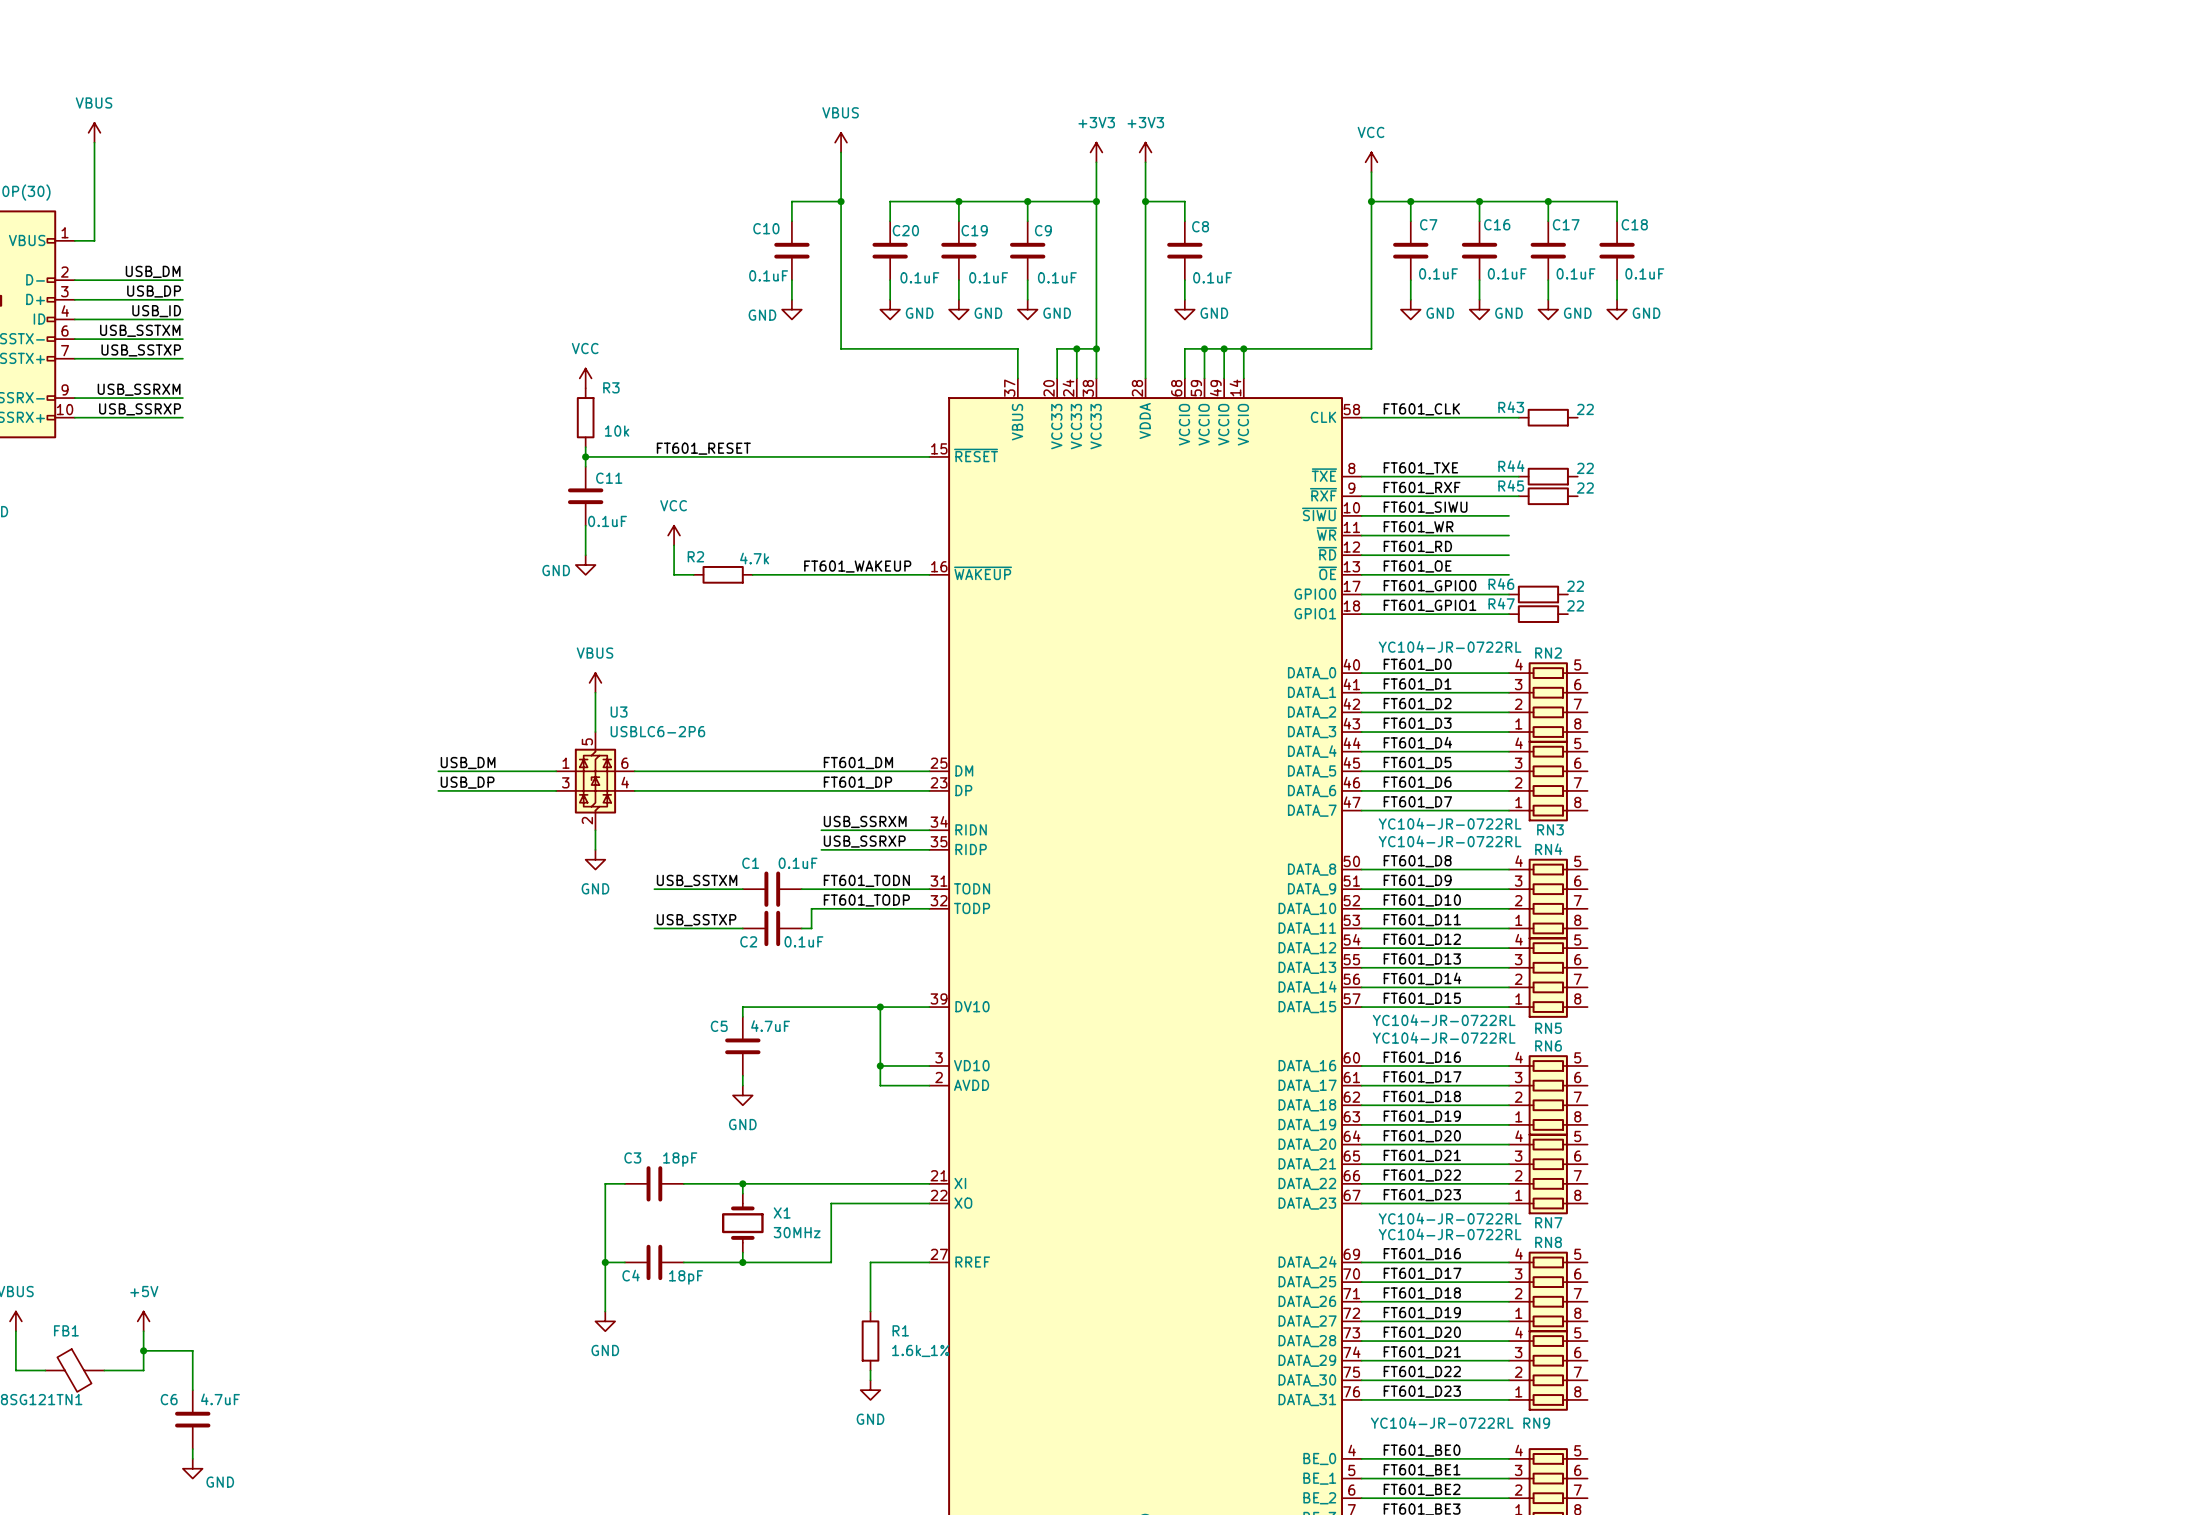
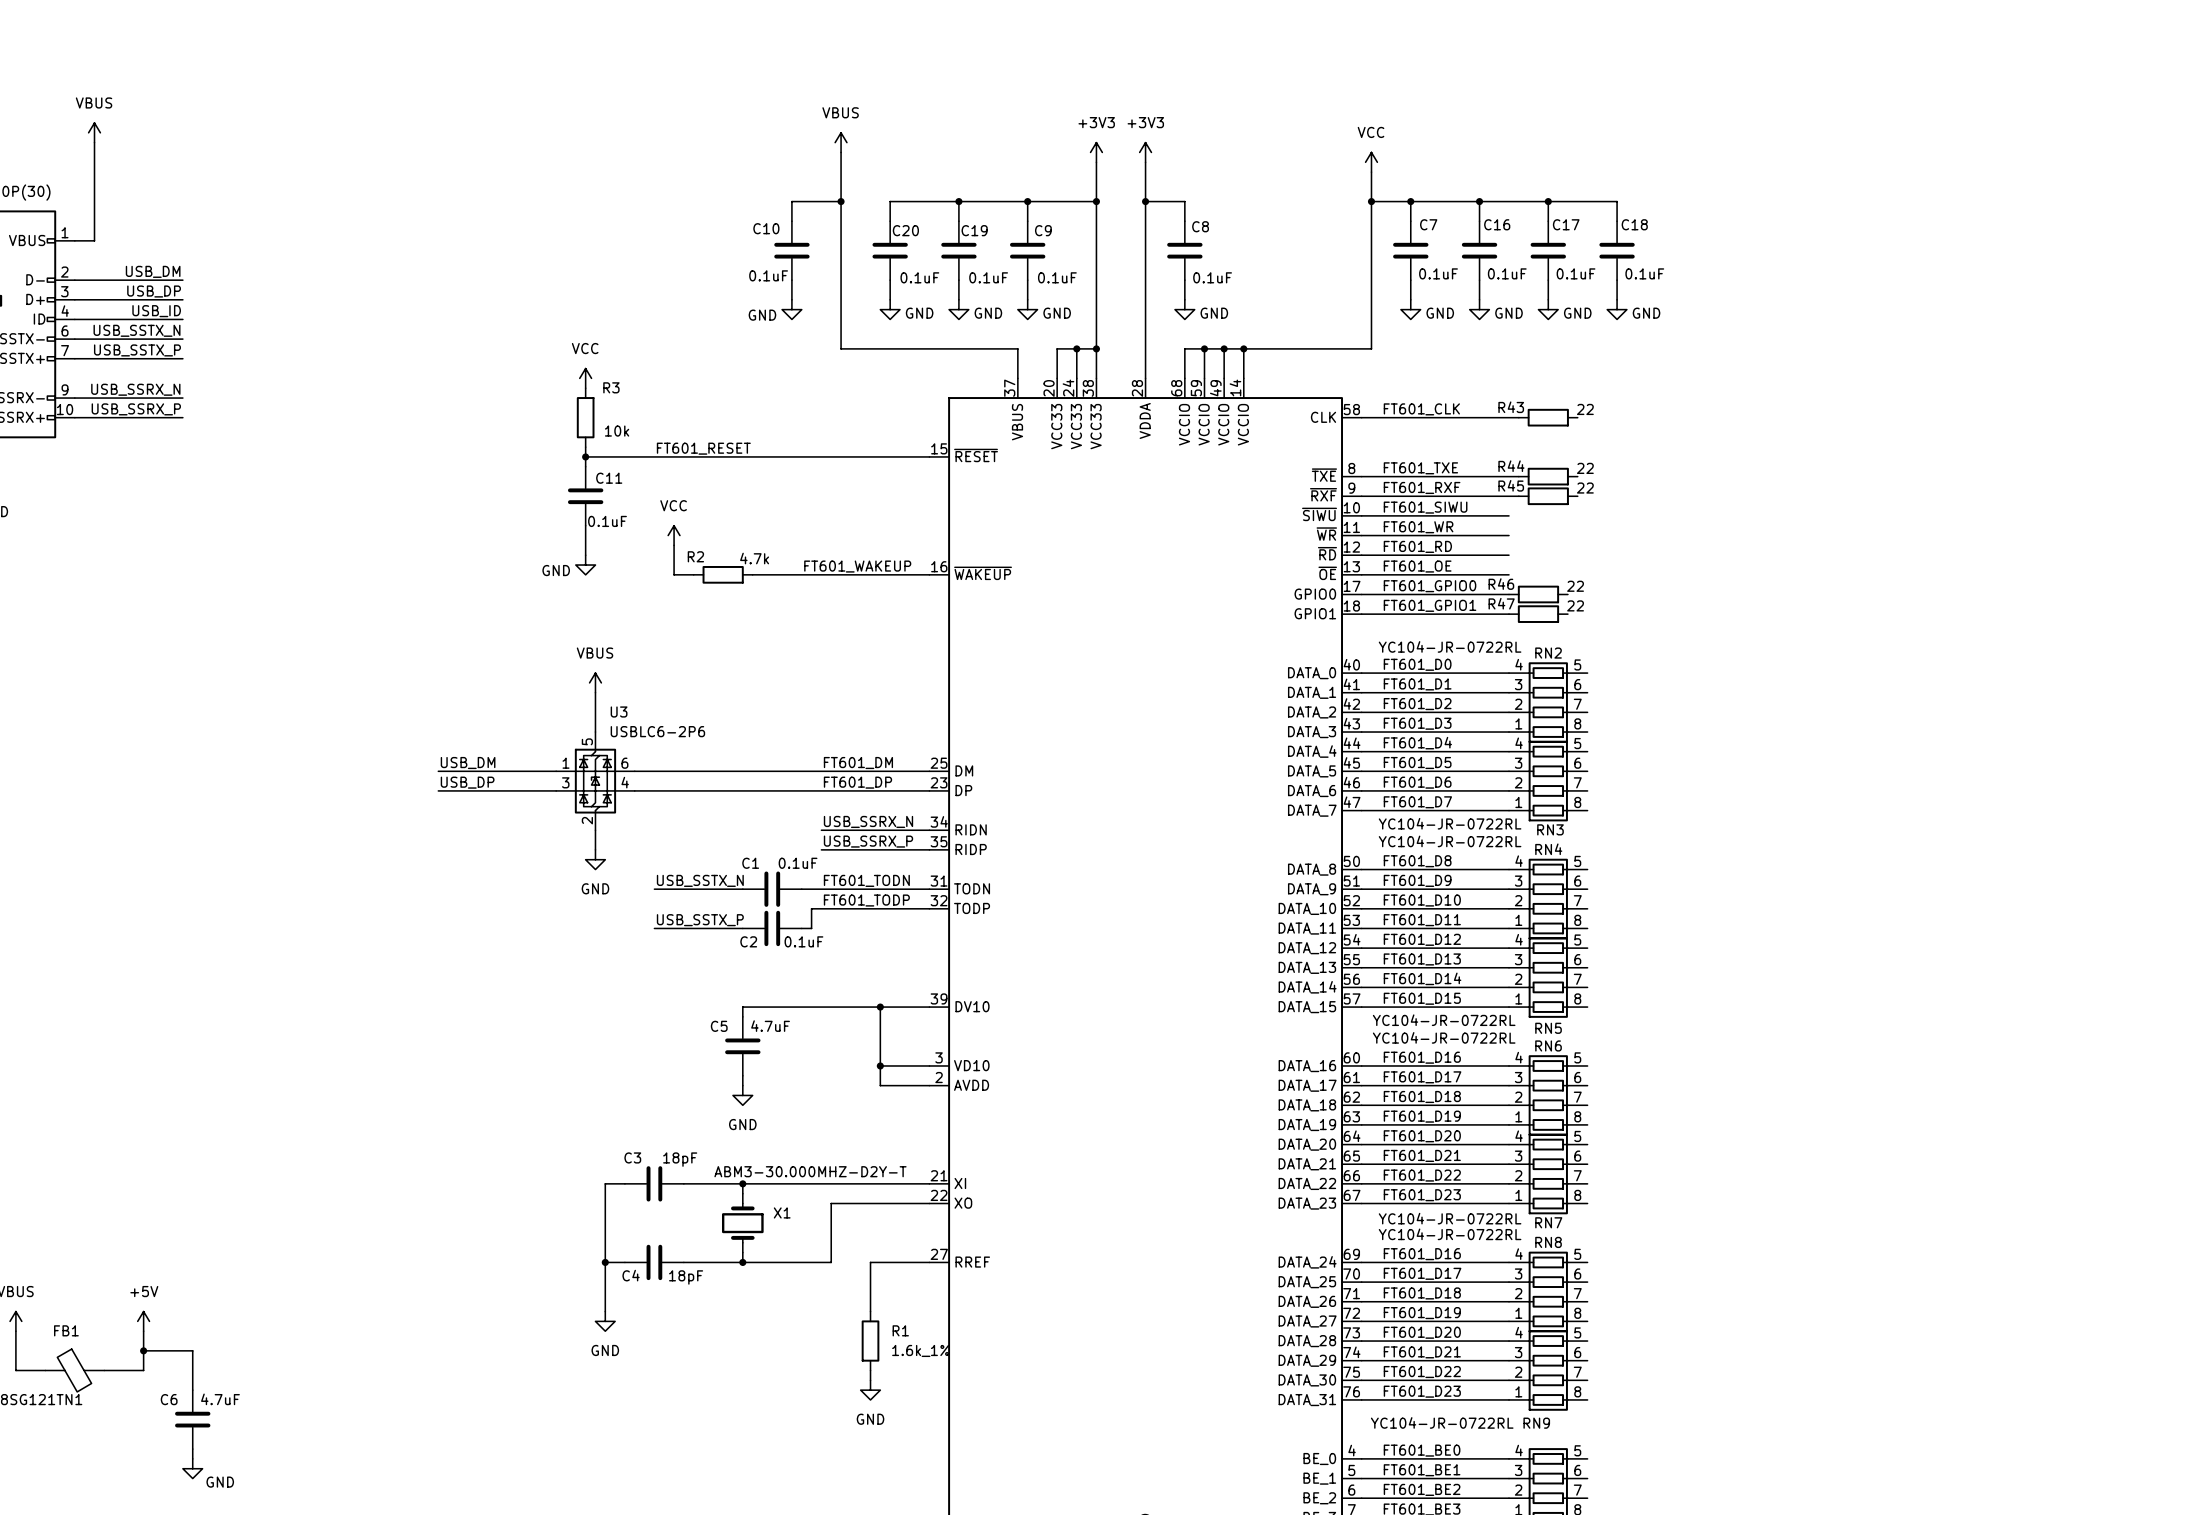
label: USB_SSTXM (140, 330) -> USB_SSTX_N (136, 330)
label: USB_SSTXP (141, 350) -> USB_SSTX_P (137, 350)
label: USB_SSRXM (139, 389) -> USB_SSRX_N (135, 389)
label: USB_SSRXP (140, 409) -> USB_SSRX_P (136, 409)
label: USB_SSRXM (865, 821) -> USB_SSRX_N (868, 821)
label: USB_SSRXP (864, 841) -> USB_SSRX_P (868, 841)
label: USB_SSTXM (697, 880) -> USB_SSTX_N (700, 880)
label: USB_SSTXP (696, 920) -> USB_SSTX_P (700, 920)
X1 value: 30MHz (797, 1232) -> ABM3-30.000MHZ-D2Y-T (810, 1171)

